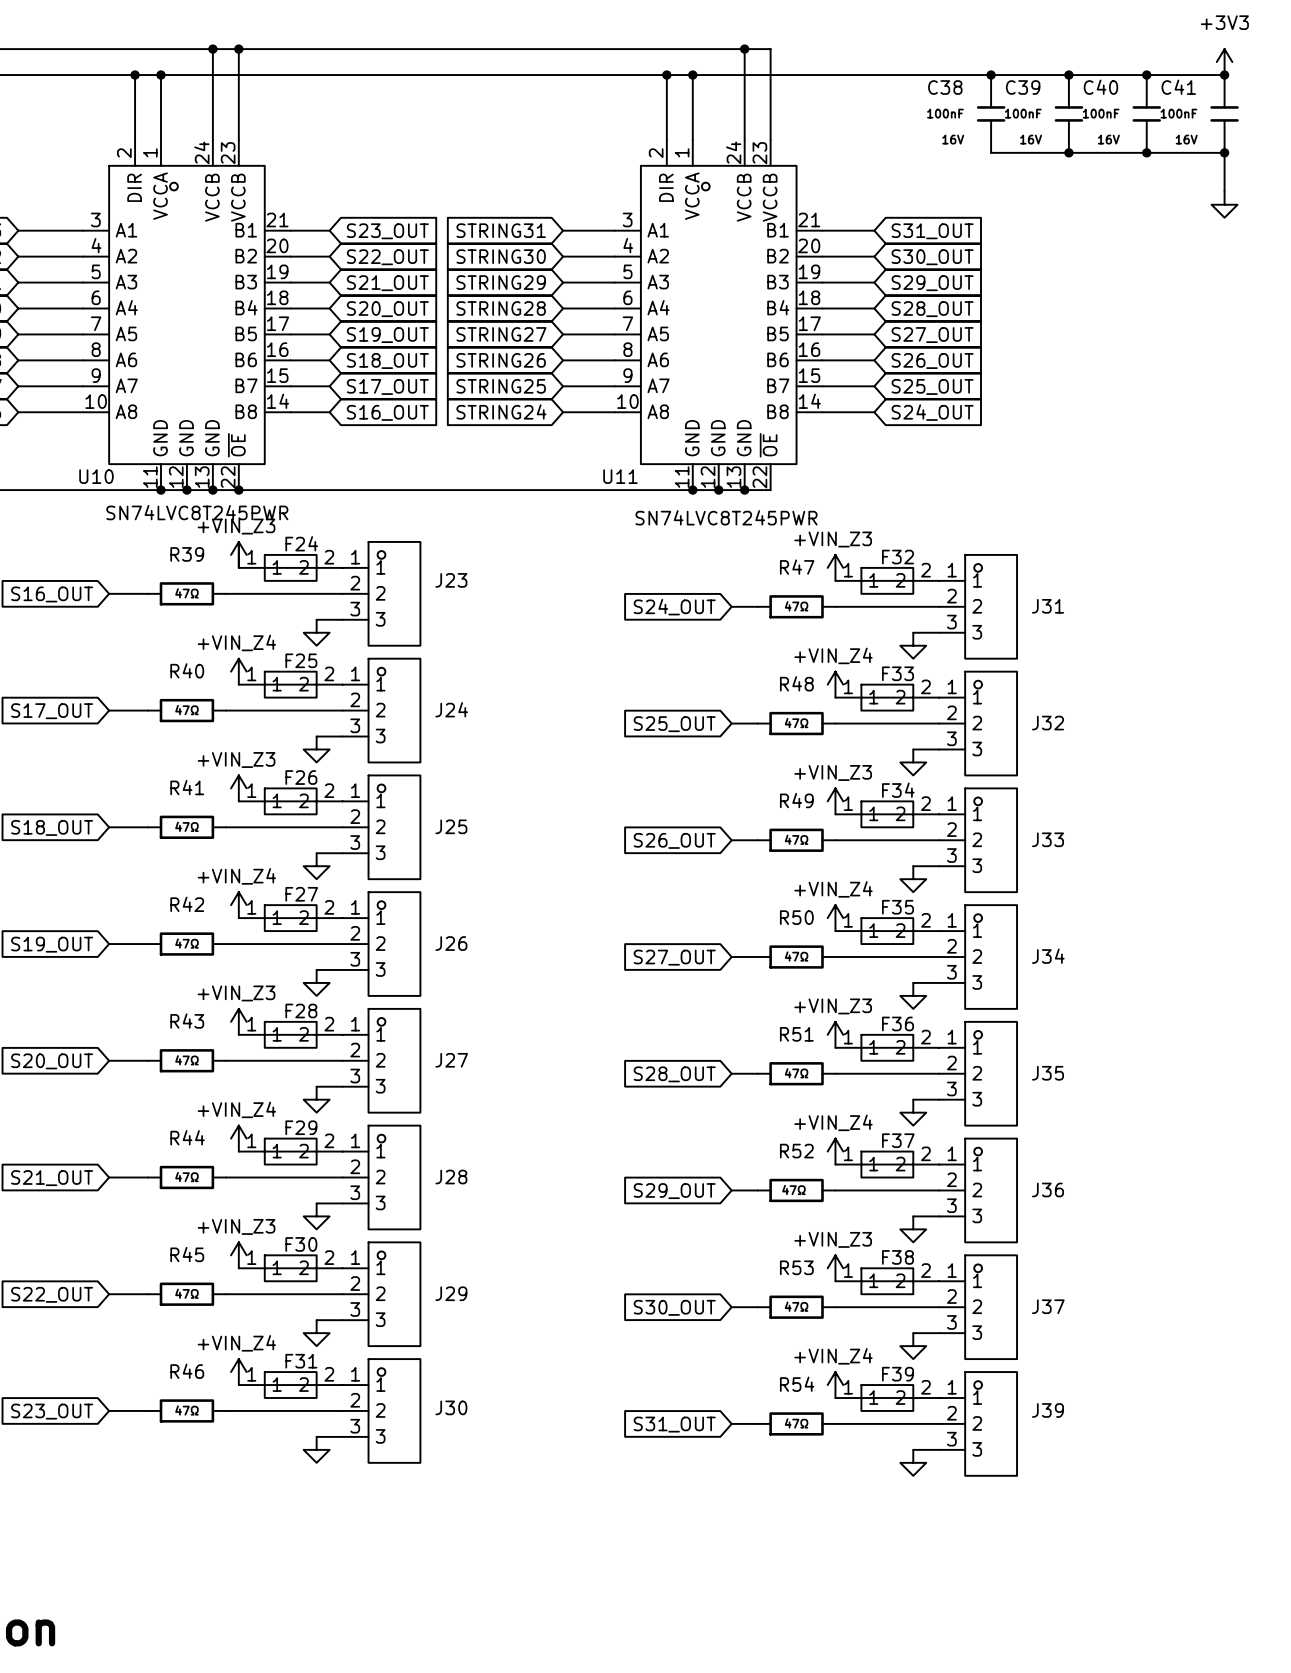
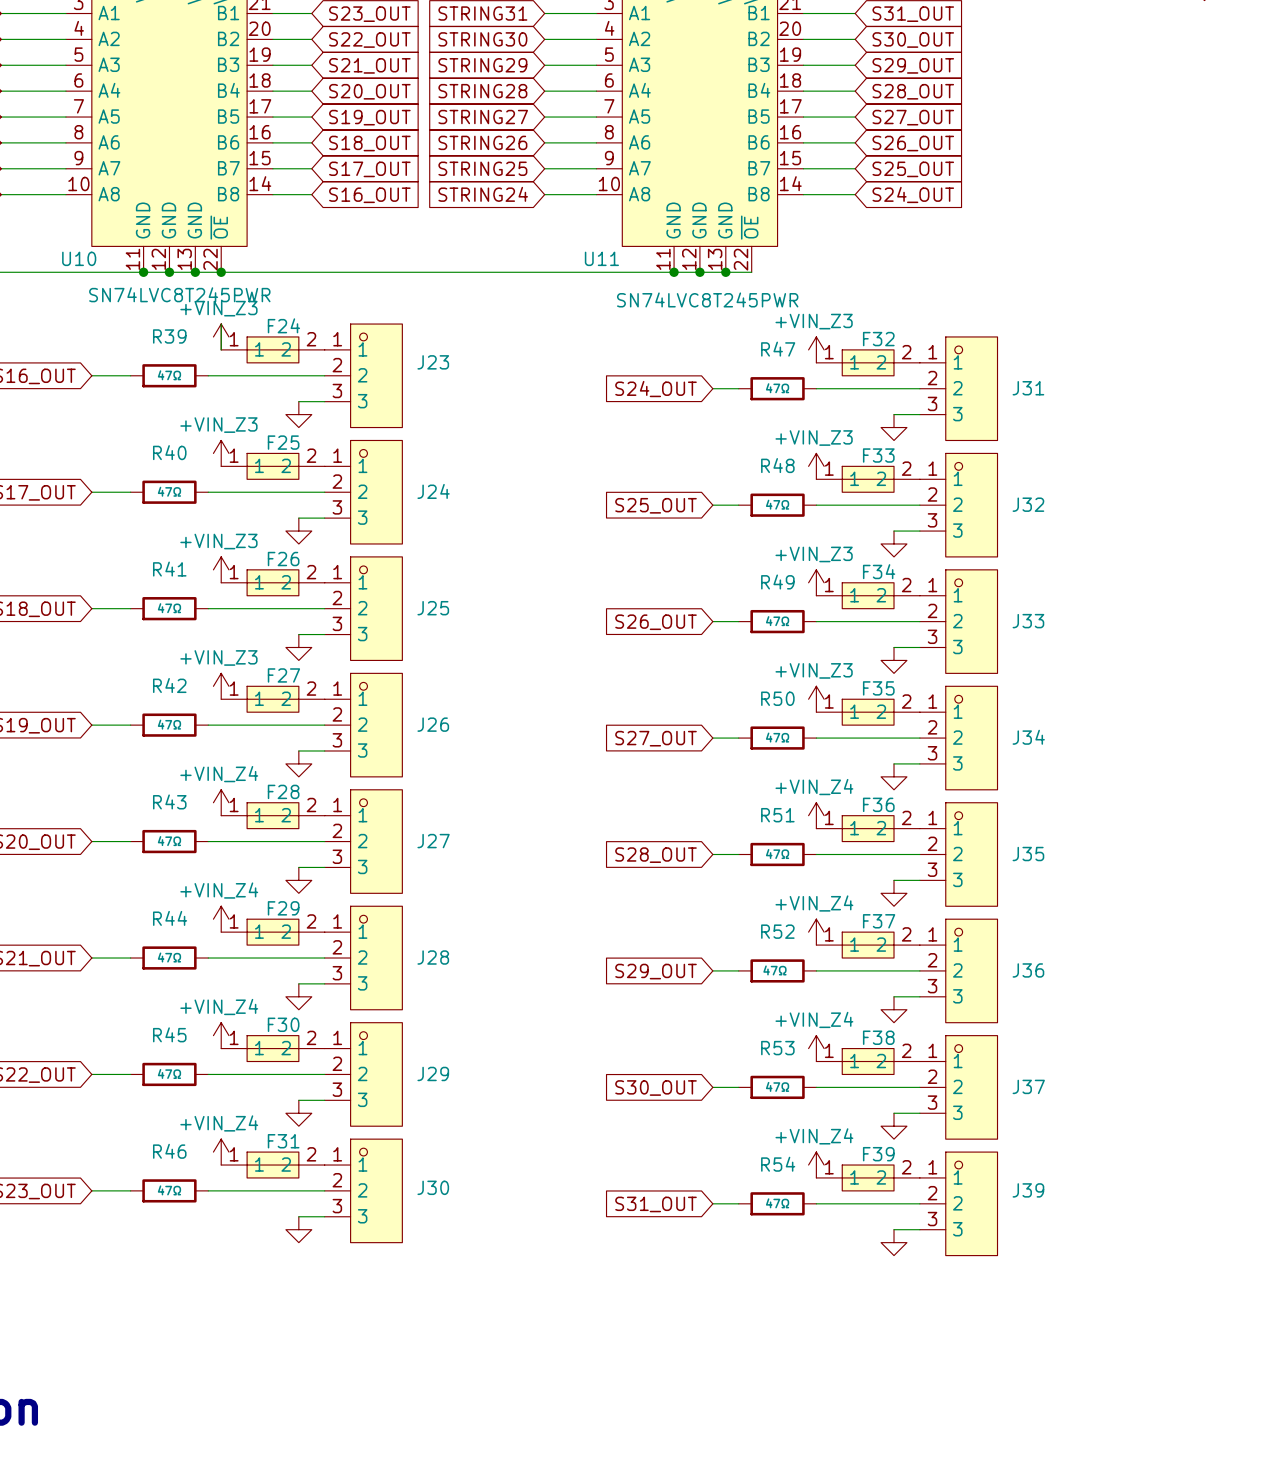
power symbol: +VIN_Z4 (238, 671) -> +VIN_Z3 (221, 453)
power symbol: +VIN_Z4 (835, 684) -> +VIN_Z3 (816, 466)
power symbol: +VIN_Z4 (238, 905) -> +VIN_Z3 (221, 686)
power symbol: +VIN_Z4 (835, 918) -> +VIN_Z3 (816, 699)
power symbol: +VIN_Z3 (238, 1021) -> +VIN_Z4 (221, 802)
power symbol: +VIN_Z3 (835, 1034) -> +VIN_Z4 (816, 815)
power symbol: +VIN_Z3 (238, 1255) -> +VIN_Z4 (221, 1035)
power symbol: +VIN_Z3 (835, 1268) -> +VIN_Z4 (816, 1048)

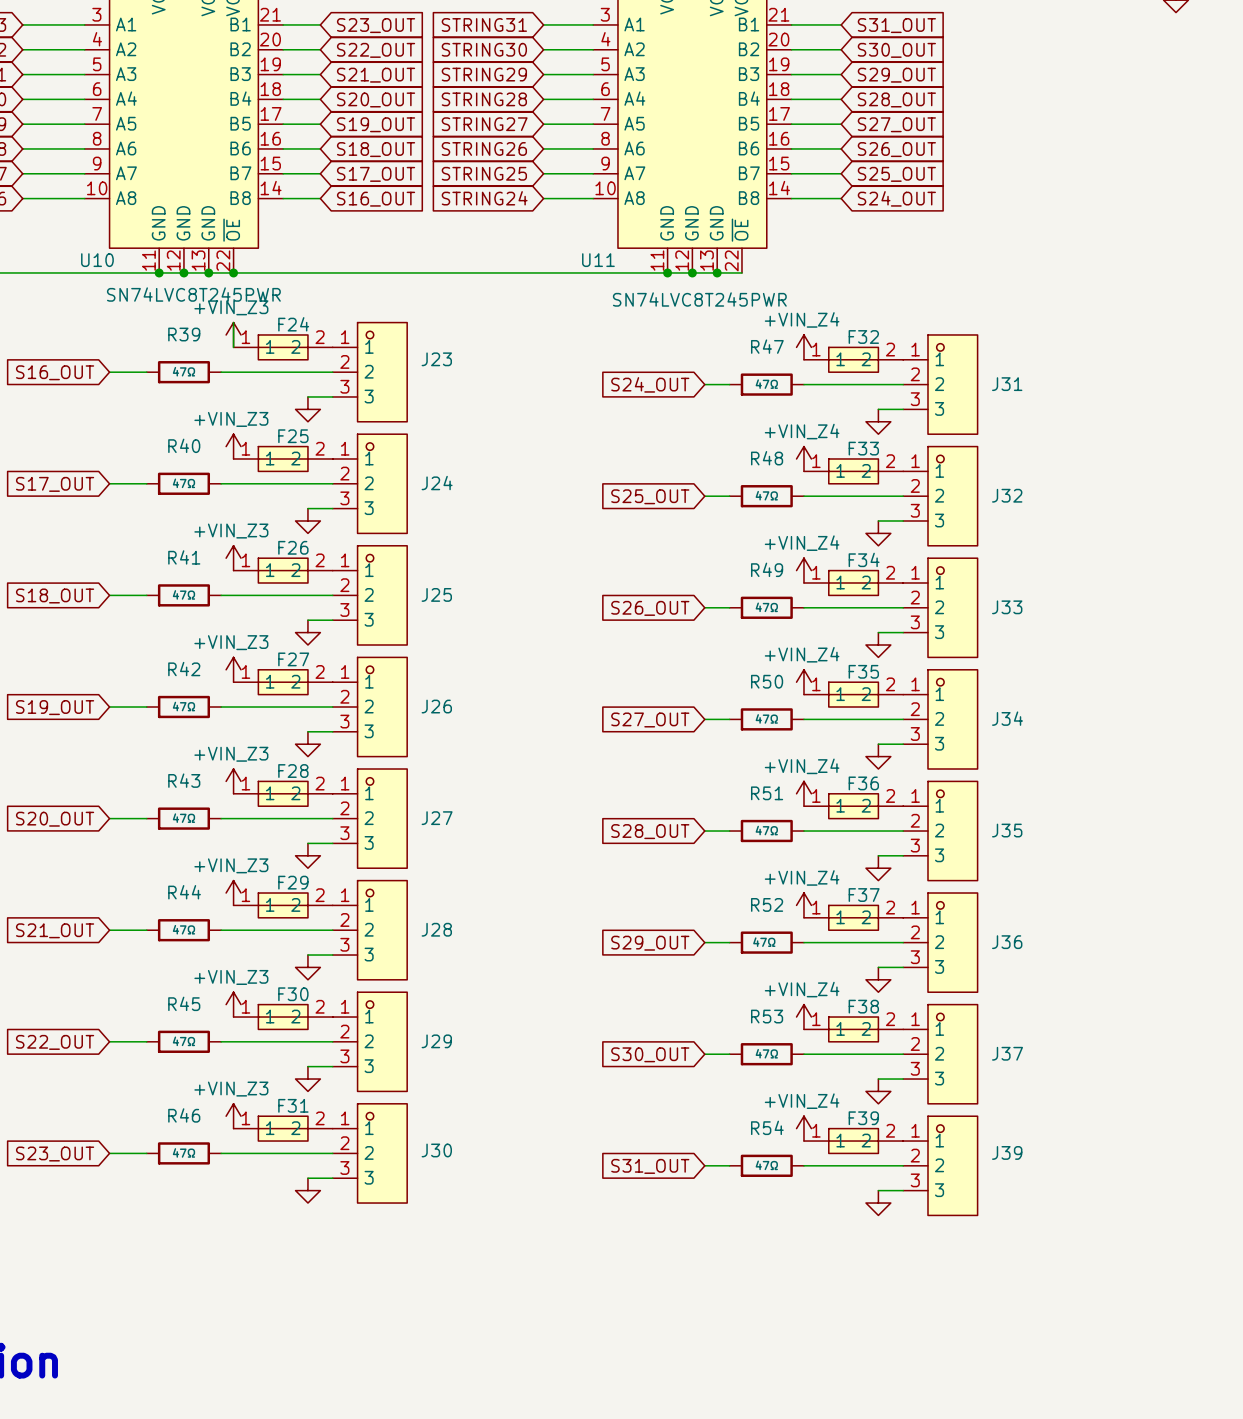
power symbol: +VIN_Z3 (816, 349) -> +VIN_Z4 (803, 347)
power symbol: +VIN_Z3 (816, 466) -> +VIN_Z4 (803, 458)
power symbol: +VIN_Z3 (816, 582) -> +VIN_Z4 (803, 570)
power symbol: +VIN_Z3 (816, 699) -> +VIN_Z4 (803, 682)
power symbol: +VIN_Z4 (221, 802) -> +VIN_Z3 (233, 781)
power symbol: +VIN_Z4 (221, 919) -> +VIN_Z3 (233, 893)
power symbol: +VIN_Z4 (221, 1035) -> +VIN_Z3 (233, 1004)
power symbol: +VIN_Z4 (221, 1152) -> +VIN_Z3 (233, 1116)

